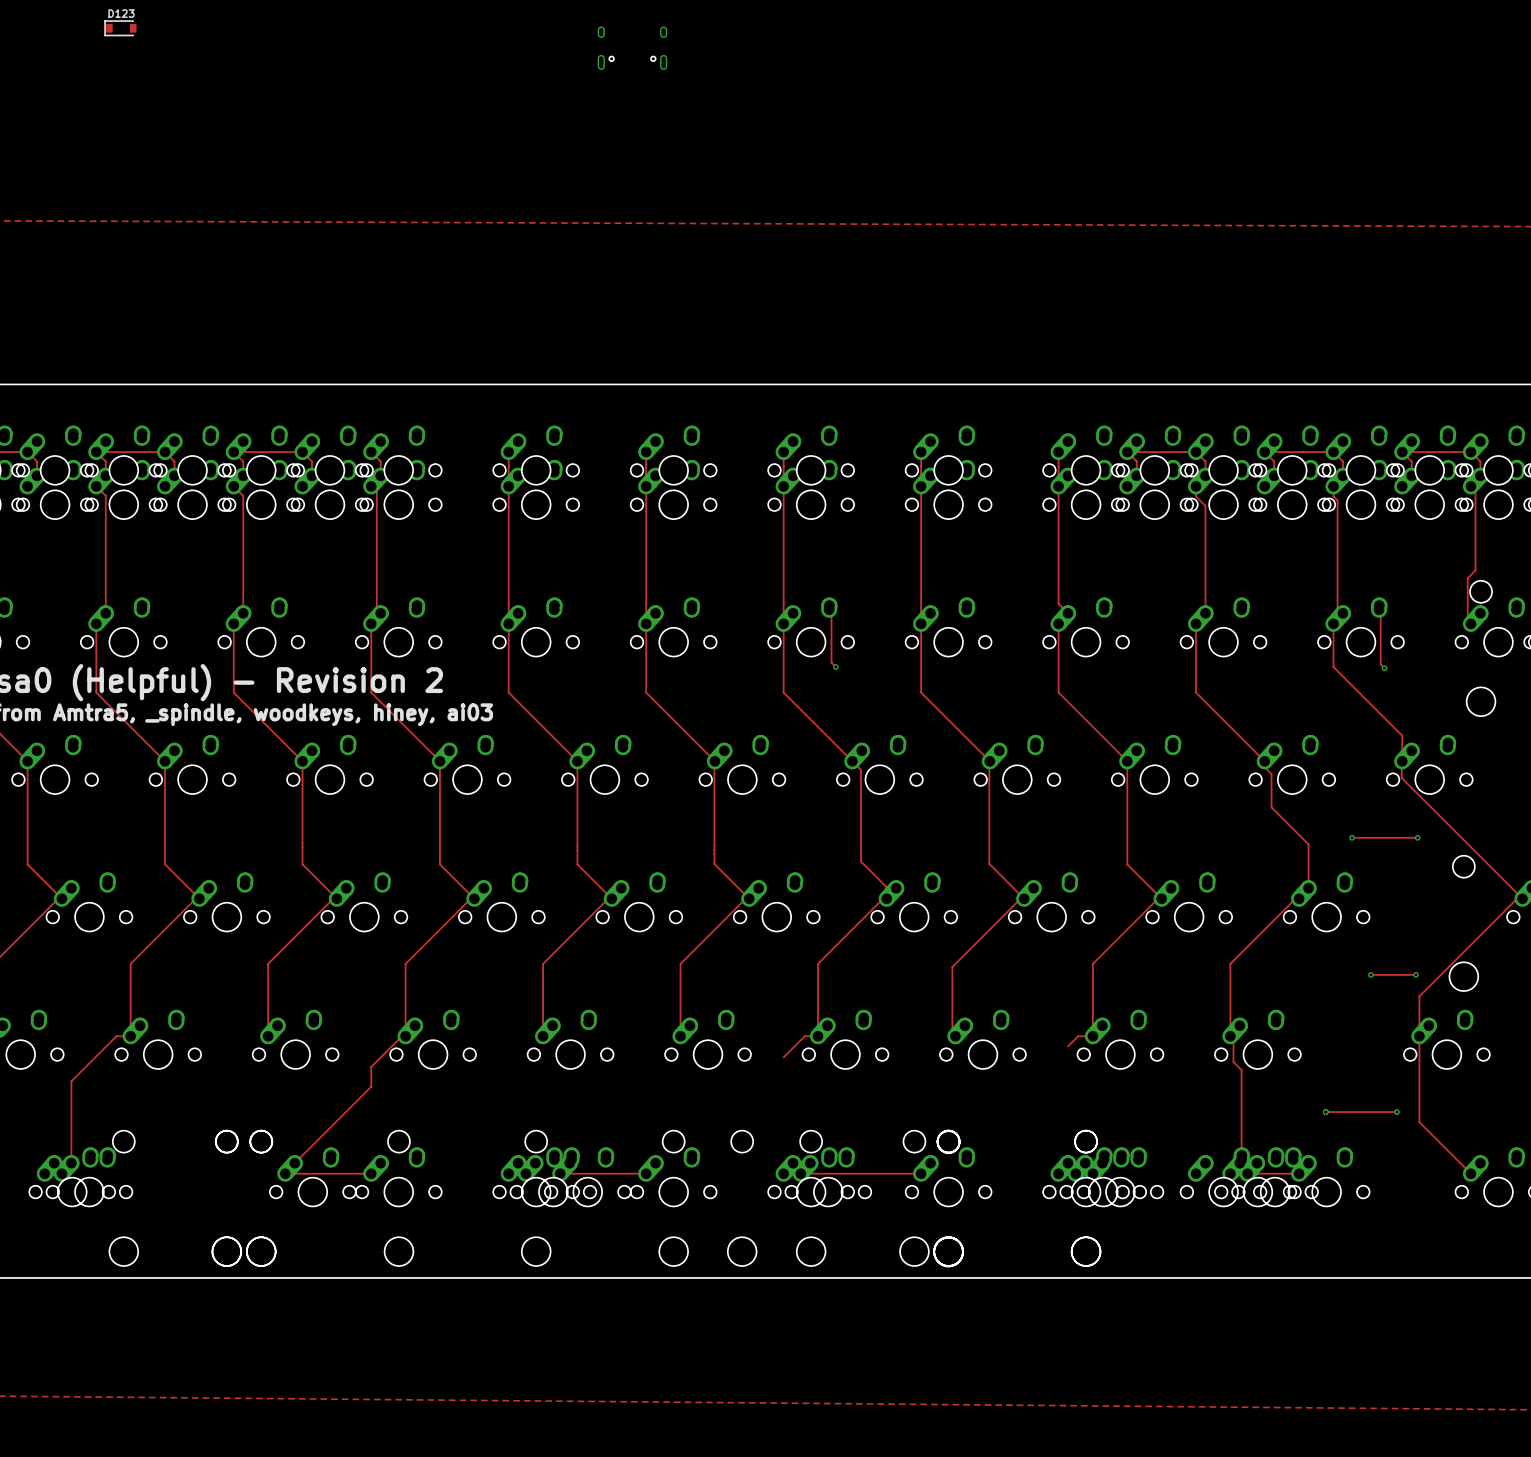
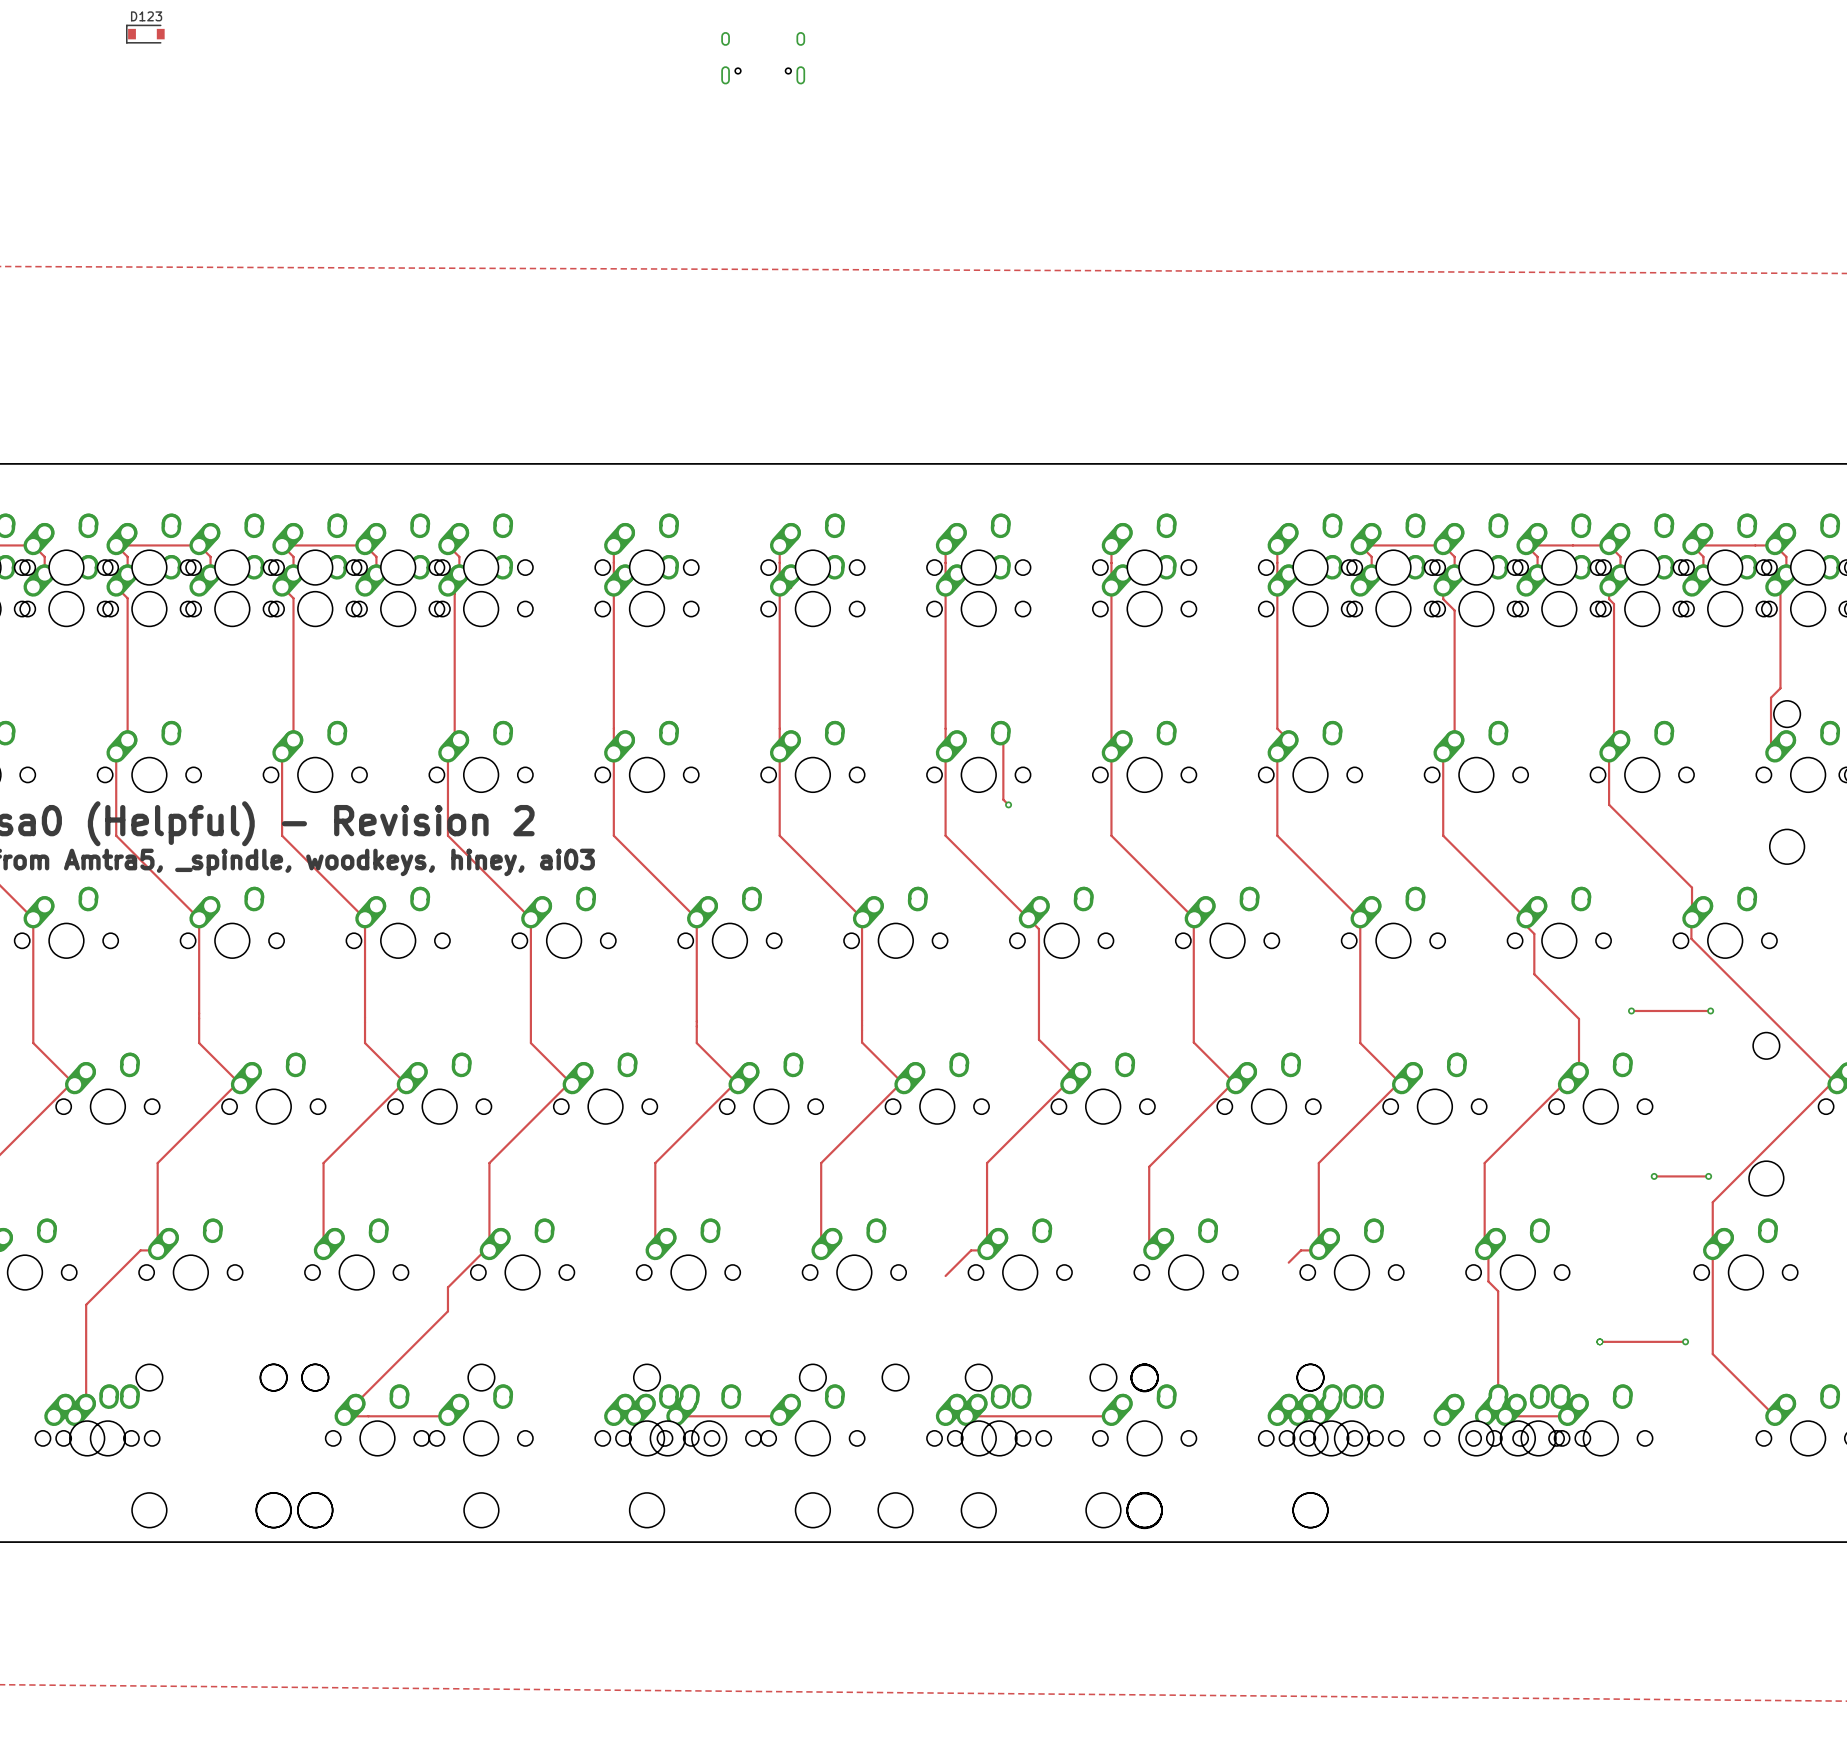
track: (1379, 605) (1380, 664) (1384, 668) -> none
via: (1384, 668) -> none

